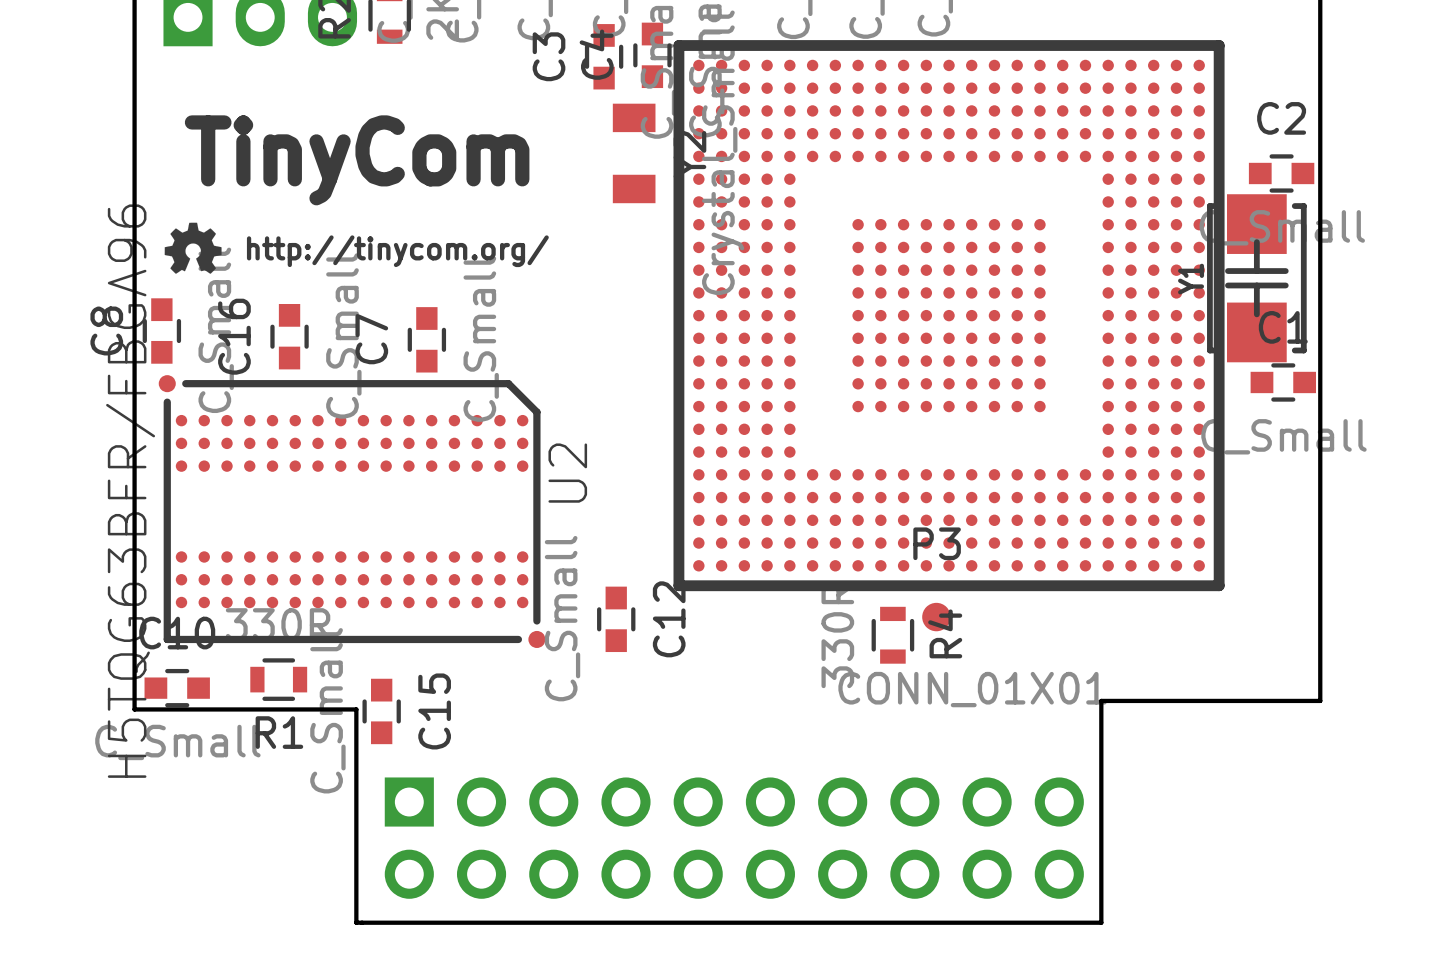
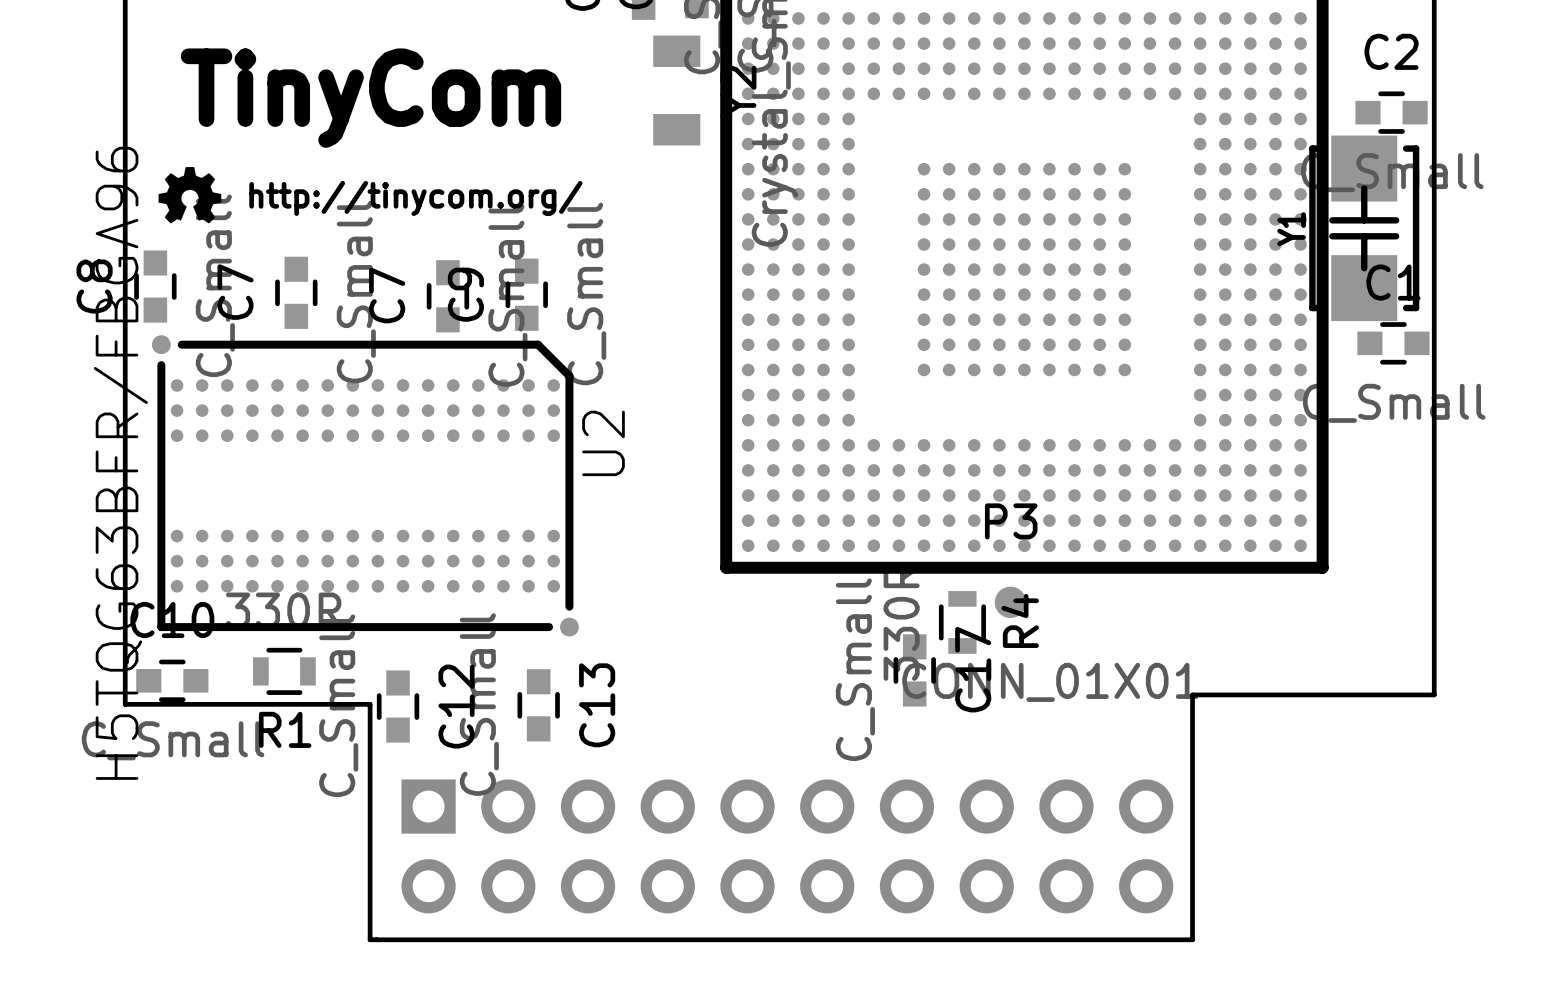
C16 name: C16 (234, 336) -> C7 (235, 292)
C9: none -> C_Small (526, 294)
C12: C_Small (616, 619) -> none
C17: none -> C_Small (914, 670)
C13: none -> C_Small (538, 705)
C15 name: C15 (434, 711) -> C12 (456, 706)

